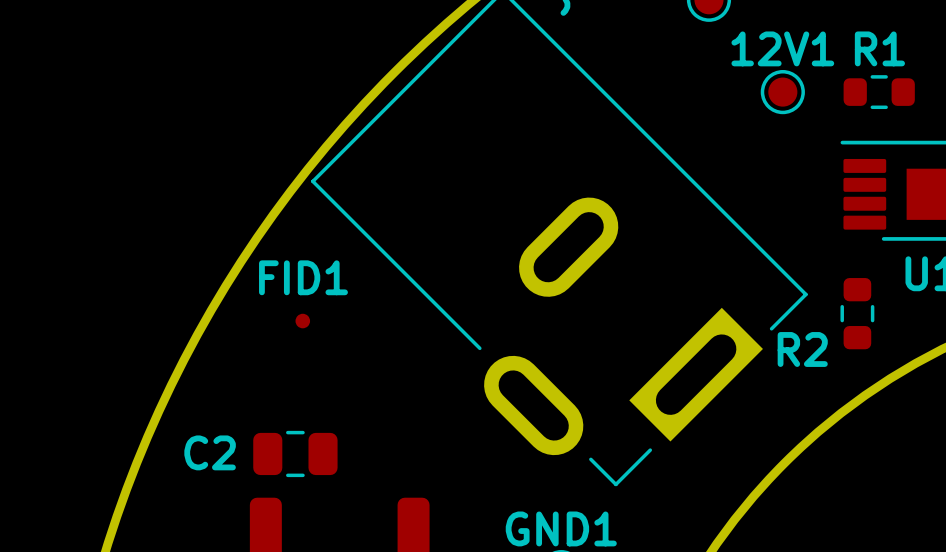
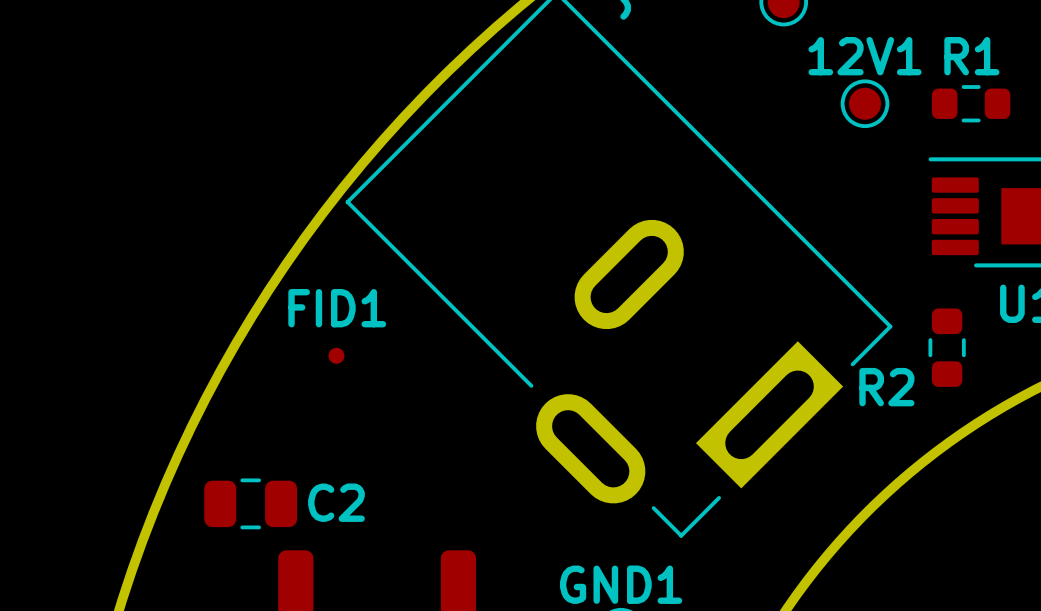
C2 name position: C2 (210, 452) -> C2 (336, 502)
C2 position: (295, 453) -> (250, 503)

